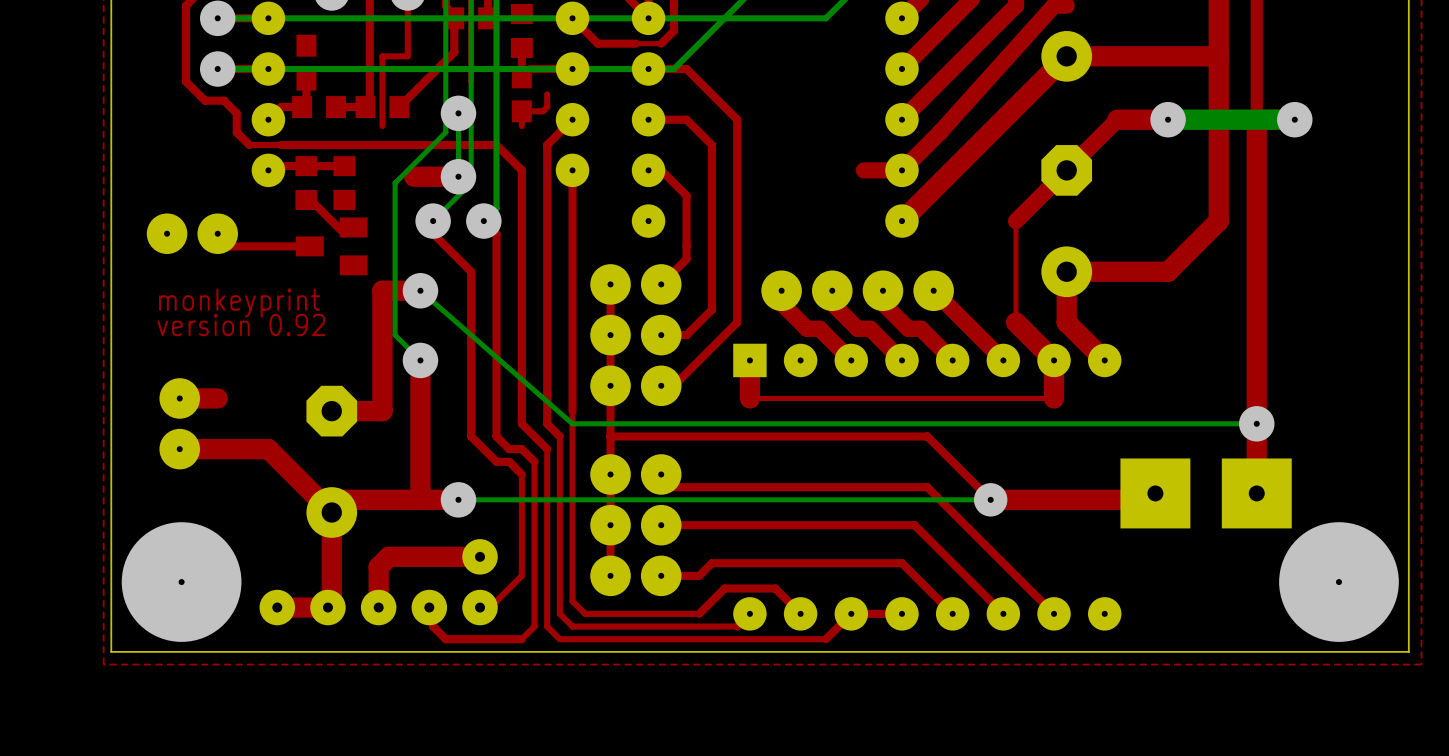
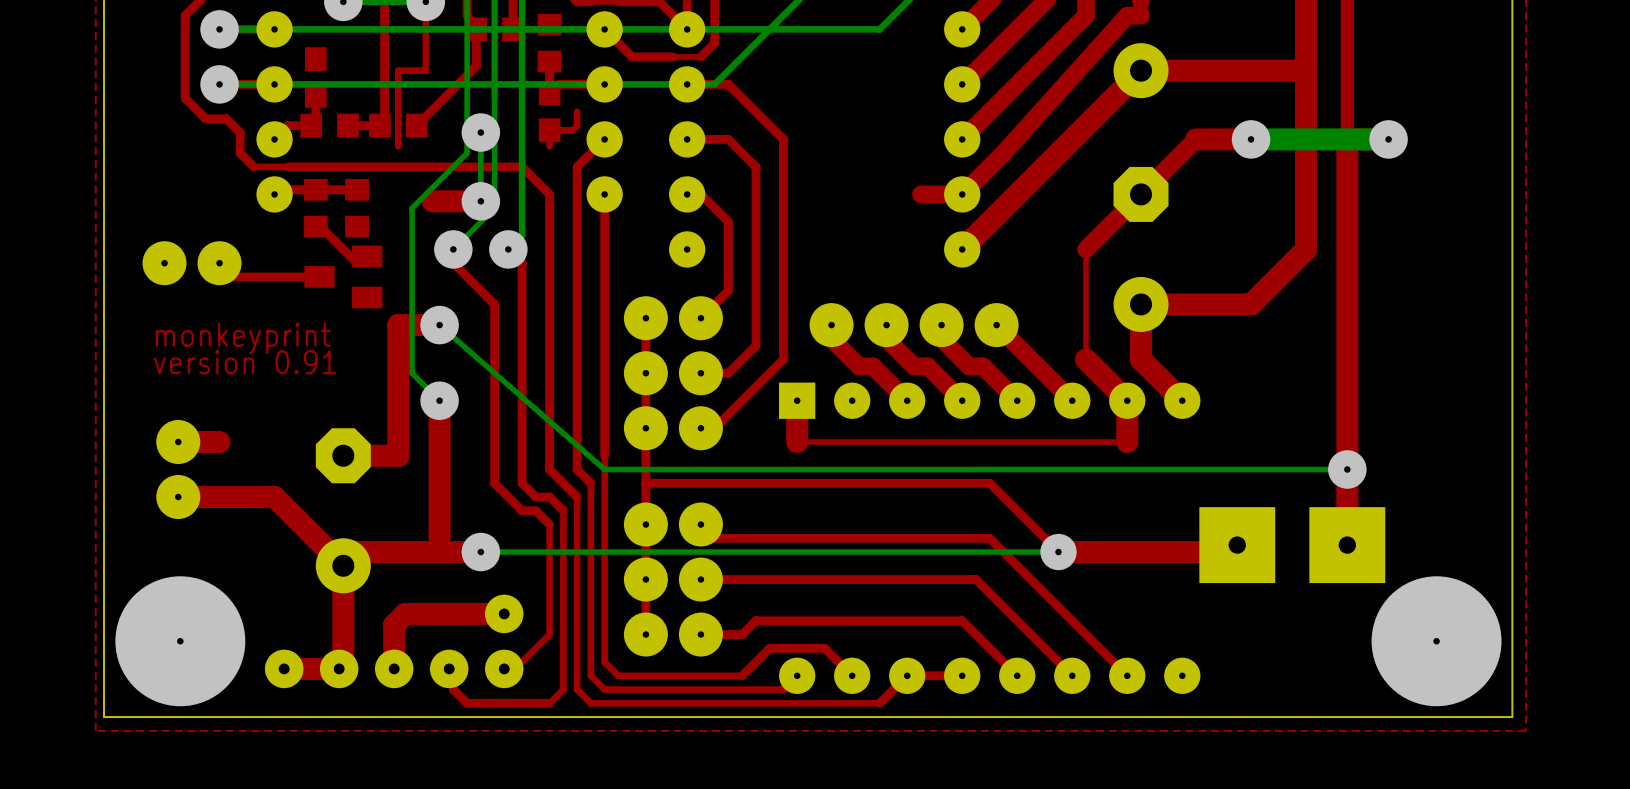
text: version 0.92 (241, 324) -> version 0.91 (245, 362)

